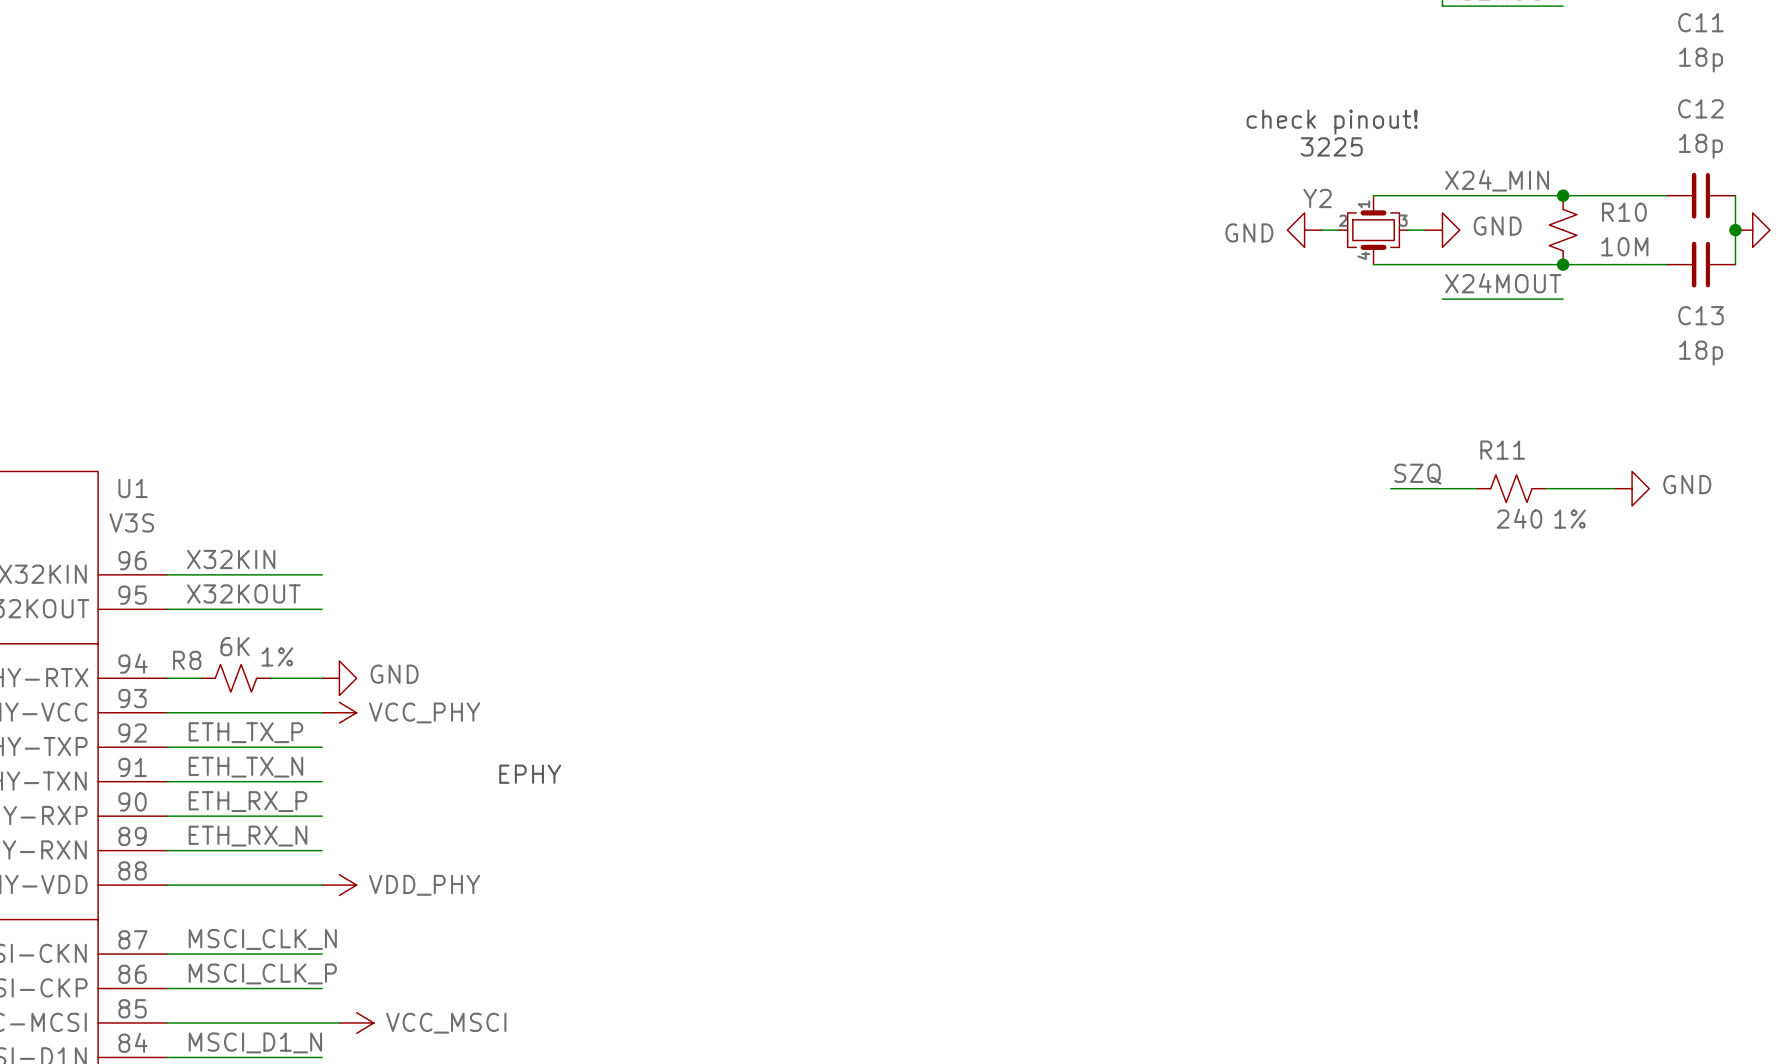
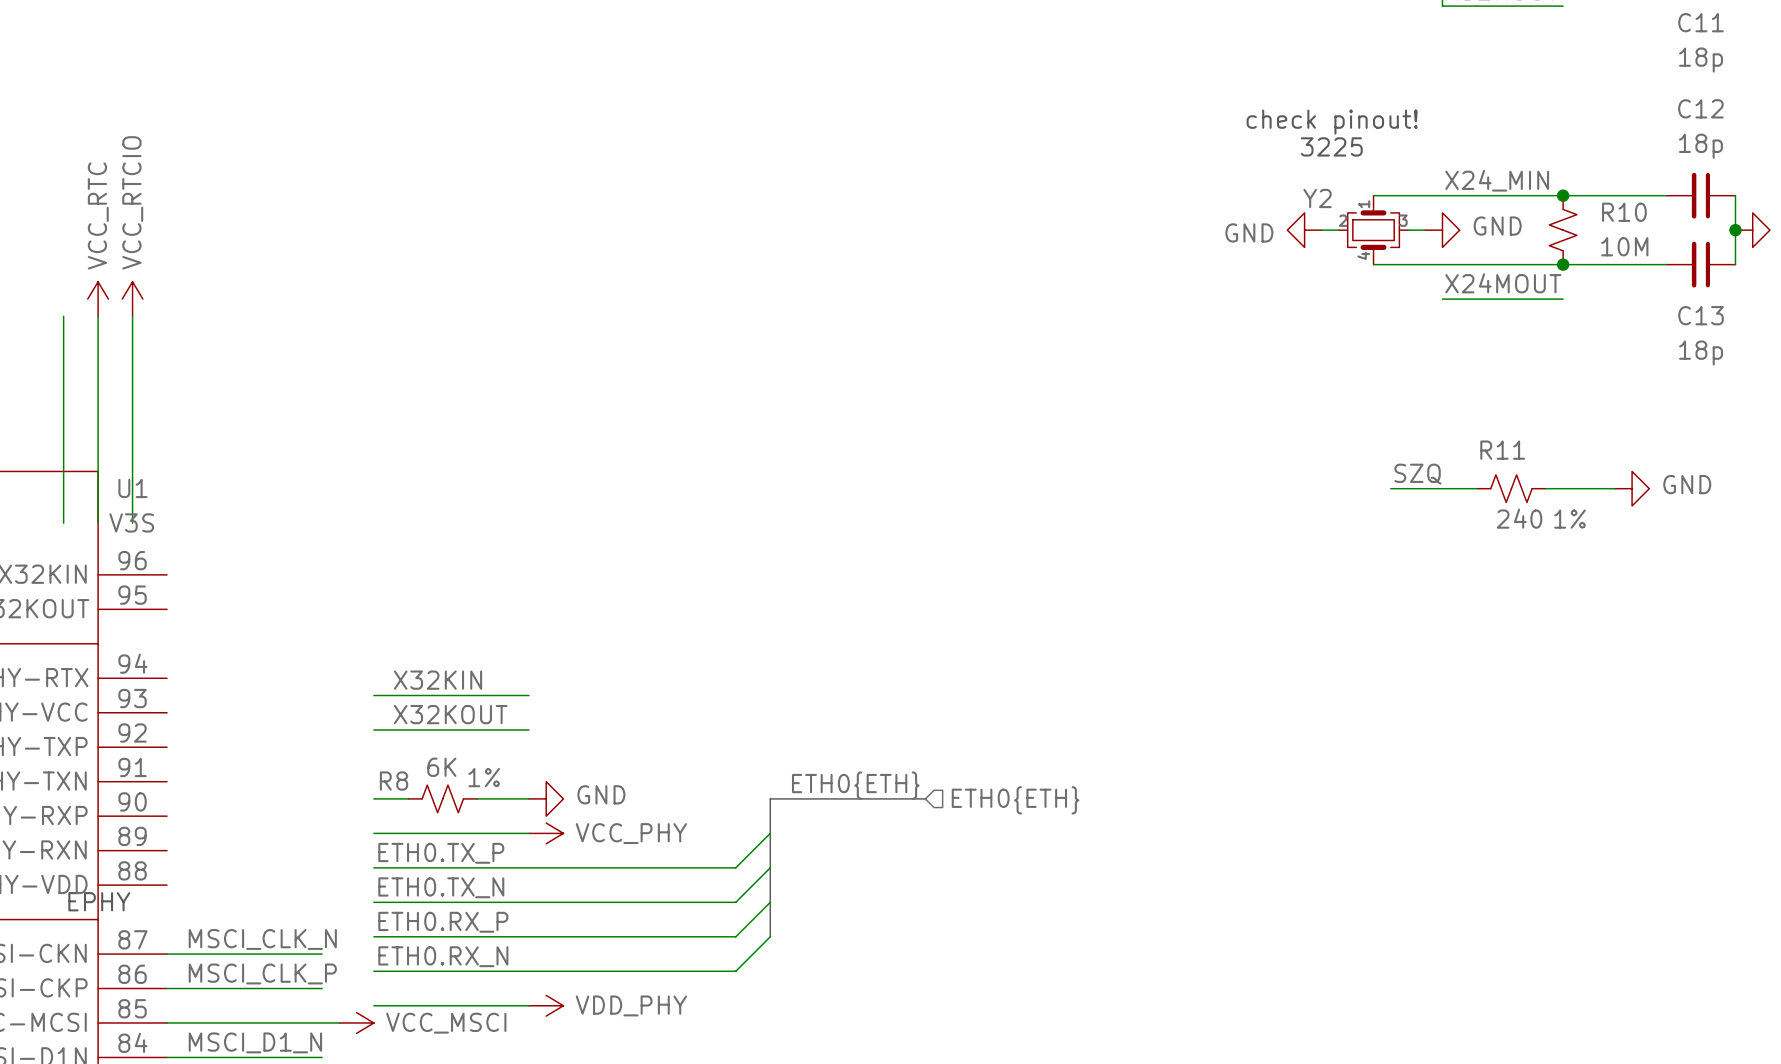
power symbol: none -> VCC_RTC (98, 299)
power symbol: none -> VCC_RTCIO (132, 299)
wire: none -> (63, 316) (63, 523)
wire: none -> (98, 316) (98, 523)
wire: none -> (132, 316) (132, 523)
label position: X32KIN (231, 559) -> X32KIN (438, 680)
wire: (167, 574) (322, 574) -> (373, 695) (528, 695)
label position: X32KOUT (243, 593) -> X32KOUT (450, 714)
wire: (167, 609) (322, 609) -> (373, 729) (528, 729)
wire: (167, 678) (201, 678) -> (373, 798) (408, 798)
R8 position: (235, 678) -> (442, 798)
wire: (270, 678) (322, 678) -> (477, 798) (528, 798)
power symbol position: GND (339, 678) -> GND (546, 798)
wire: (167, 712) (322, 712) -> (373, 833) (528, 833)
power symbol position: VCC_PHY (339, 712) -> VCC_PHY (546, 833)
label: ETH_TX_P (245, 732) -> none
wire: (167, 747) (322, 747) -> none
label: ETH_TX_N (245, 767) -> none
text: EPHY (530, 774) -> none
wire: (167, 781) (322, 781) -> none
label: none -> ETH0{ETH} (855, 785)
bus: none -> (925, 798) (770, 798) (770, 936)
hierarchical label: none -> ETH0{ETH} (1015, 800)
label: ETH_RX_P (248, 801) -> none
wire: (167, 816) (322, 816) -> none
wire: none -> (770, 833) (735, 867) (373, 867)
label: ETH_RX_N (248, 836) -> none
wire: (167, 850) (322, 850) -> none
label: none -> ETH0.TX_P (441, 853)
wire: none -> (770, 867) (735, 902) (373, 902)
wire: (167, 885) (322, 885) -> (373, 1005) (528, 1005)
power symbol position: VDD_PHY (339, 885) -> VDD_PHY (546, 1005)
label: none -> ETH0.TX_N (441, 887)
text: none -> EPHY (99, 901)
wire: none -> (770, 902) (735, 936) (373, 936)
label: none -> ETH0.RX_P (443, 922)
wire: none -> (770, 936) (735, 971) (373, 971)
label: none -> ETH0.RX_N (443, 956)

